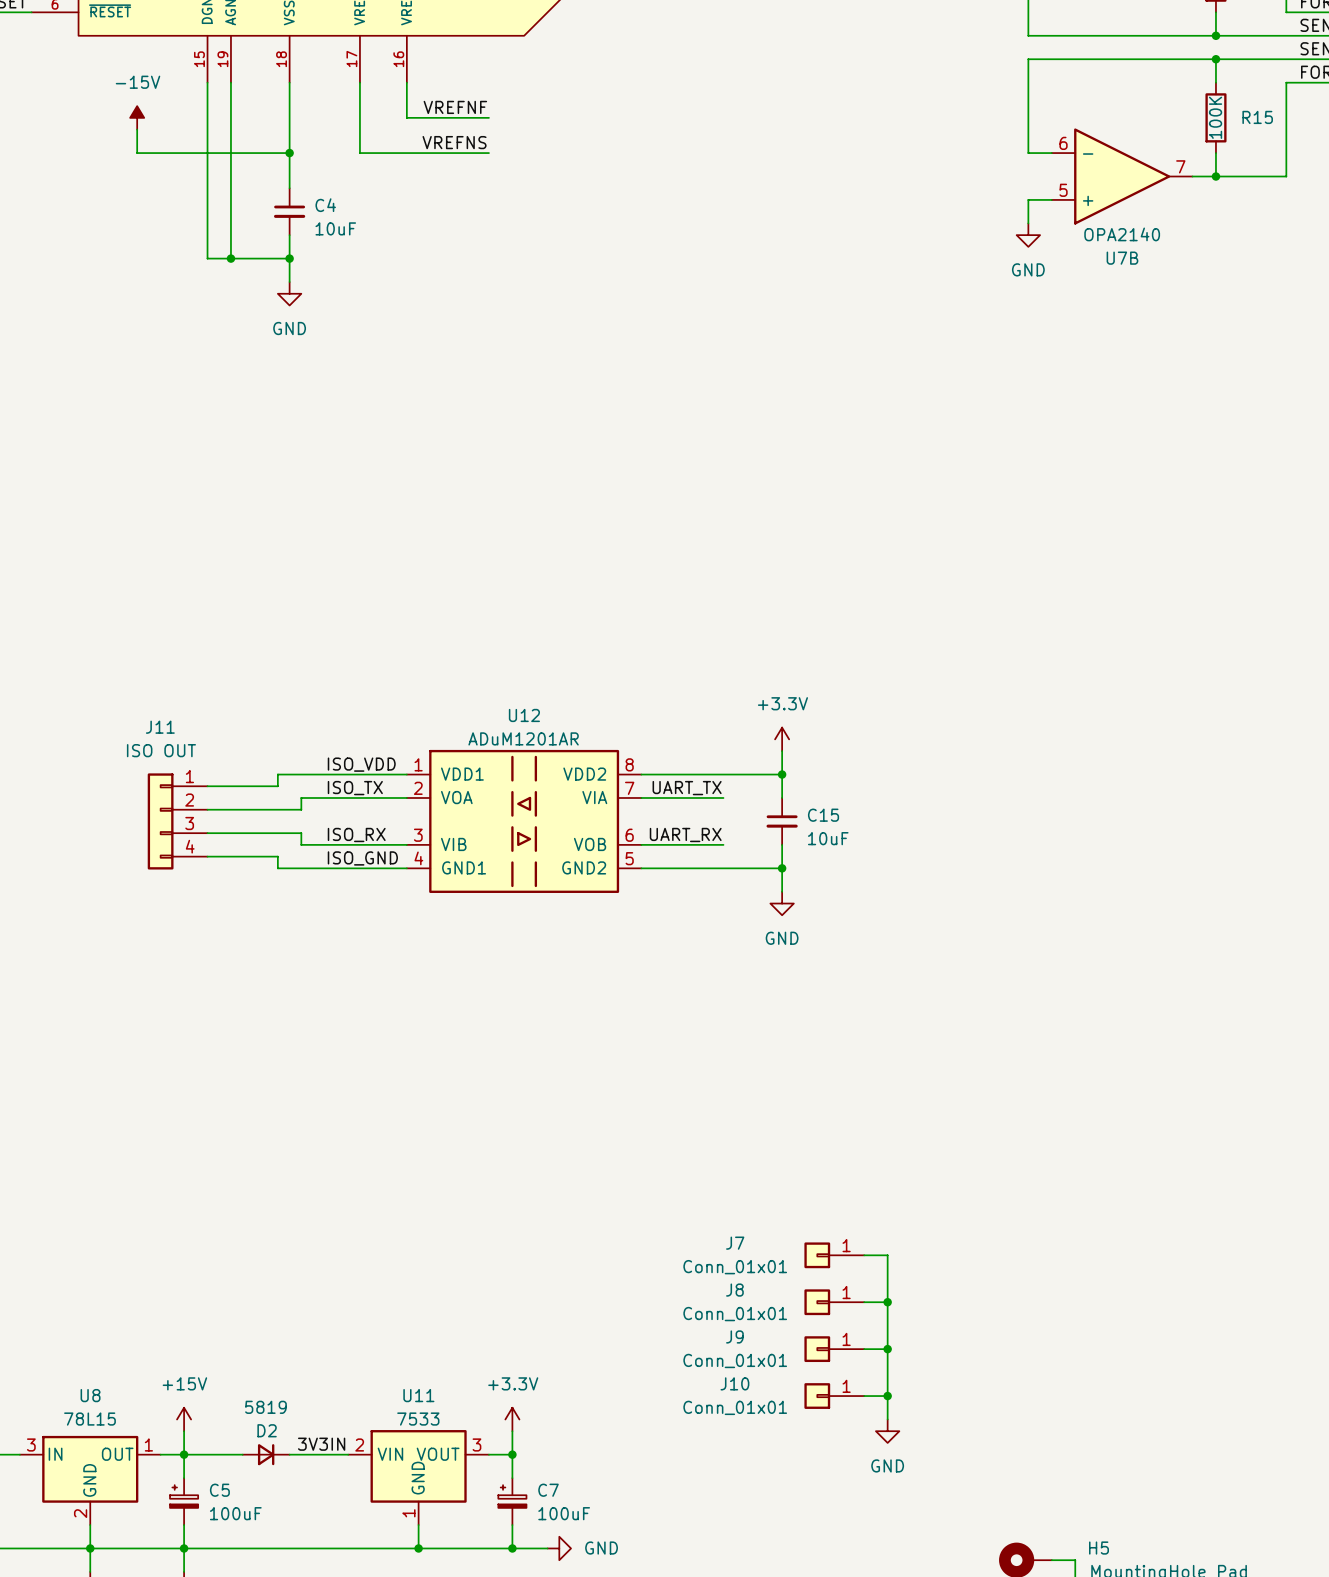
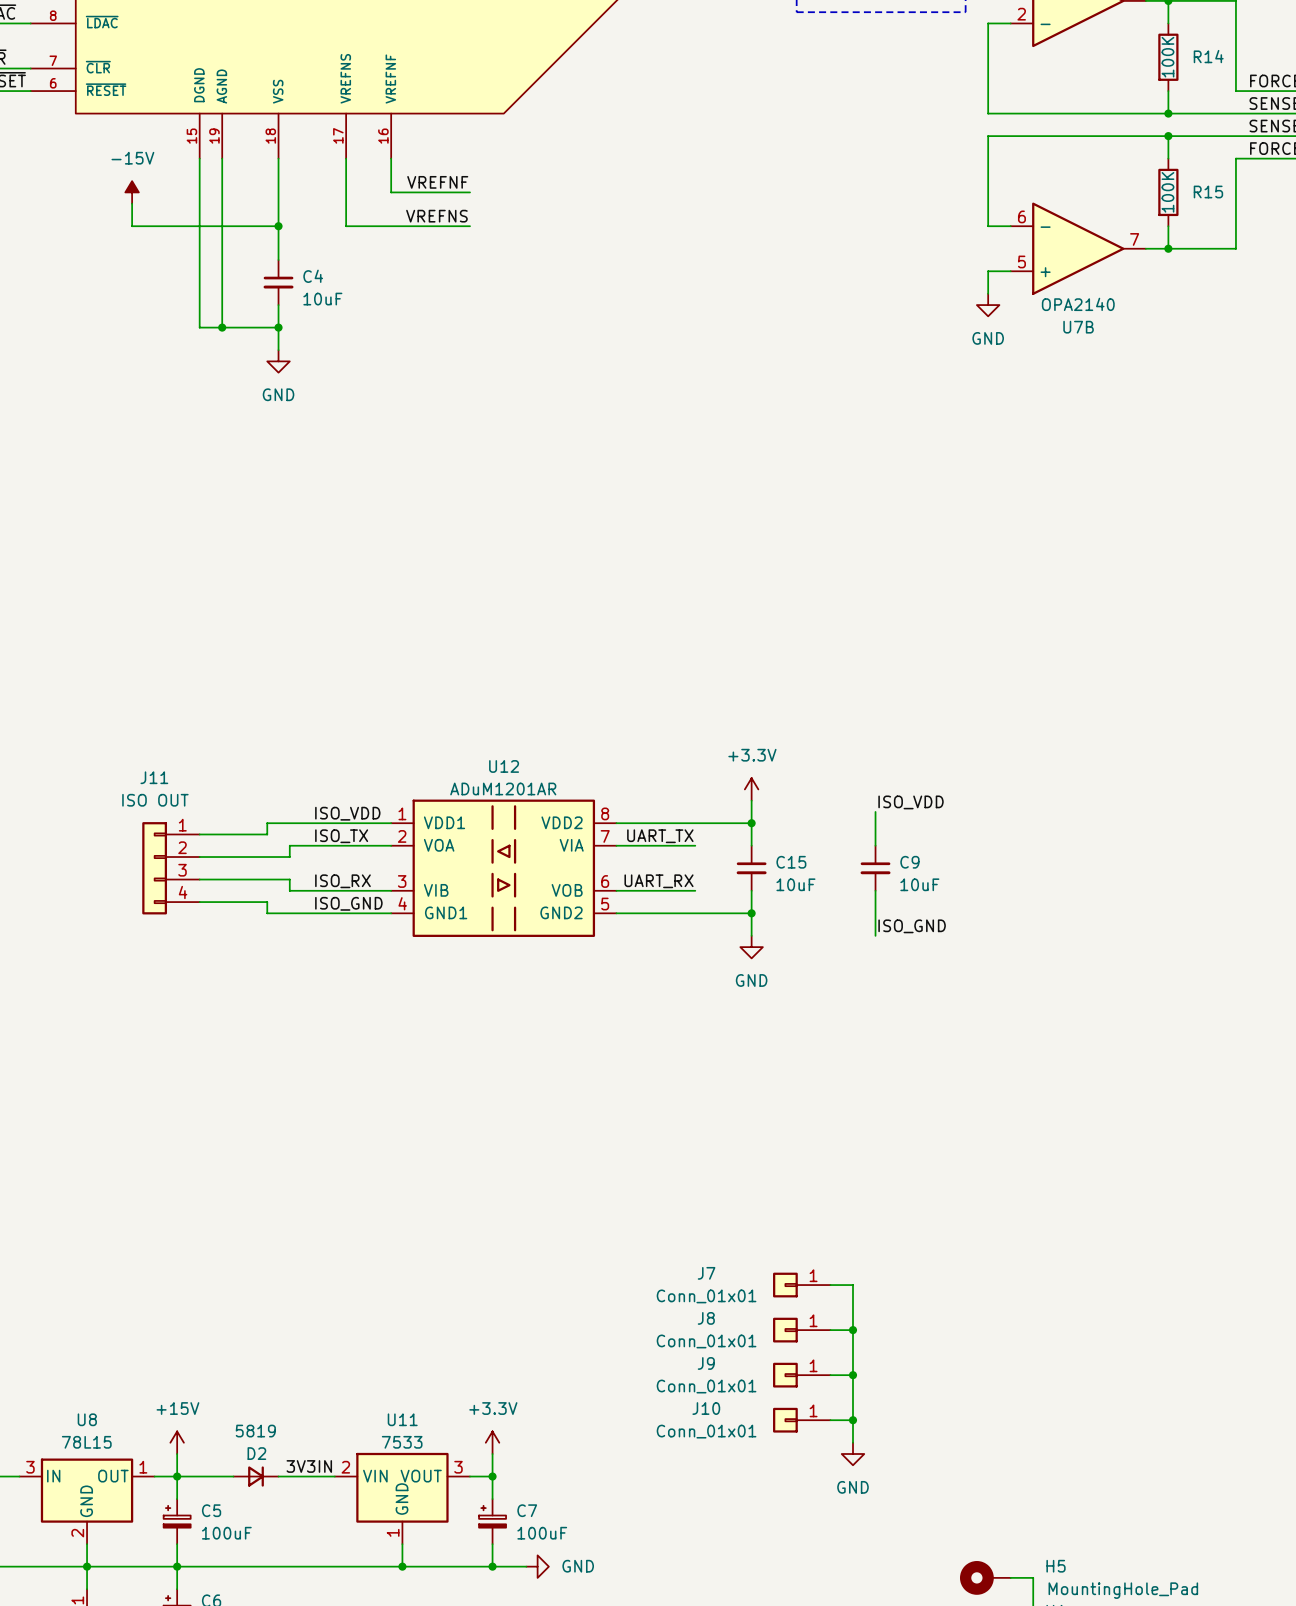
label: none -> ISO_VDD (911, 802)
wire: none -> (875, 811) (875, 845)
C9: none -> 10uF (875, 868)
wire: none -> (875, 890) (875, 935)
label: none -> ISO_GND (912, 926)

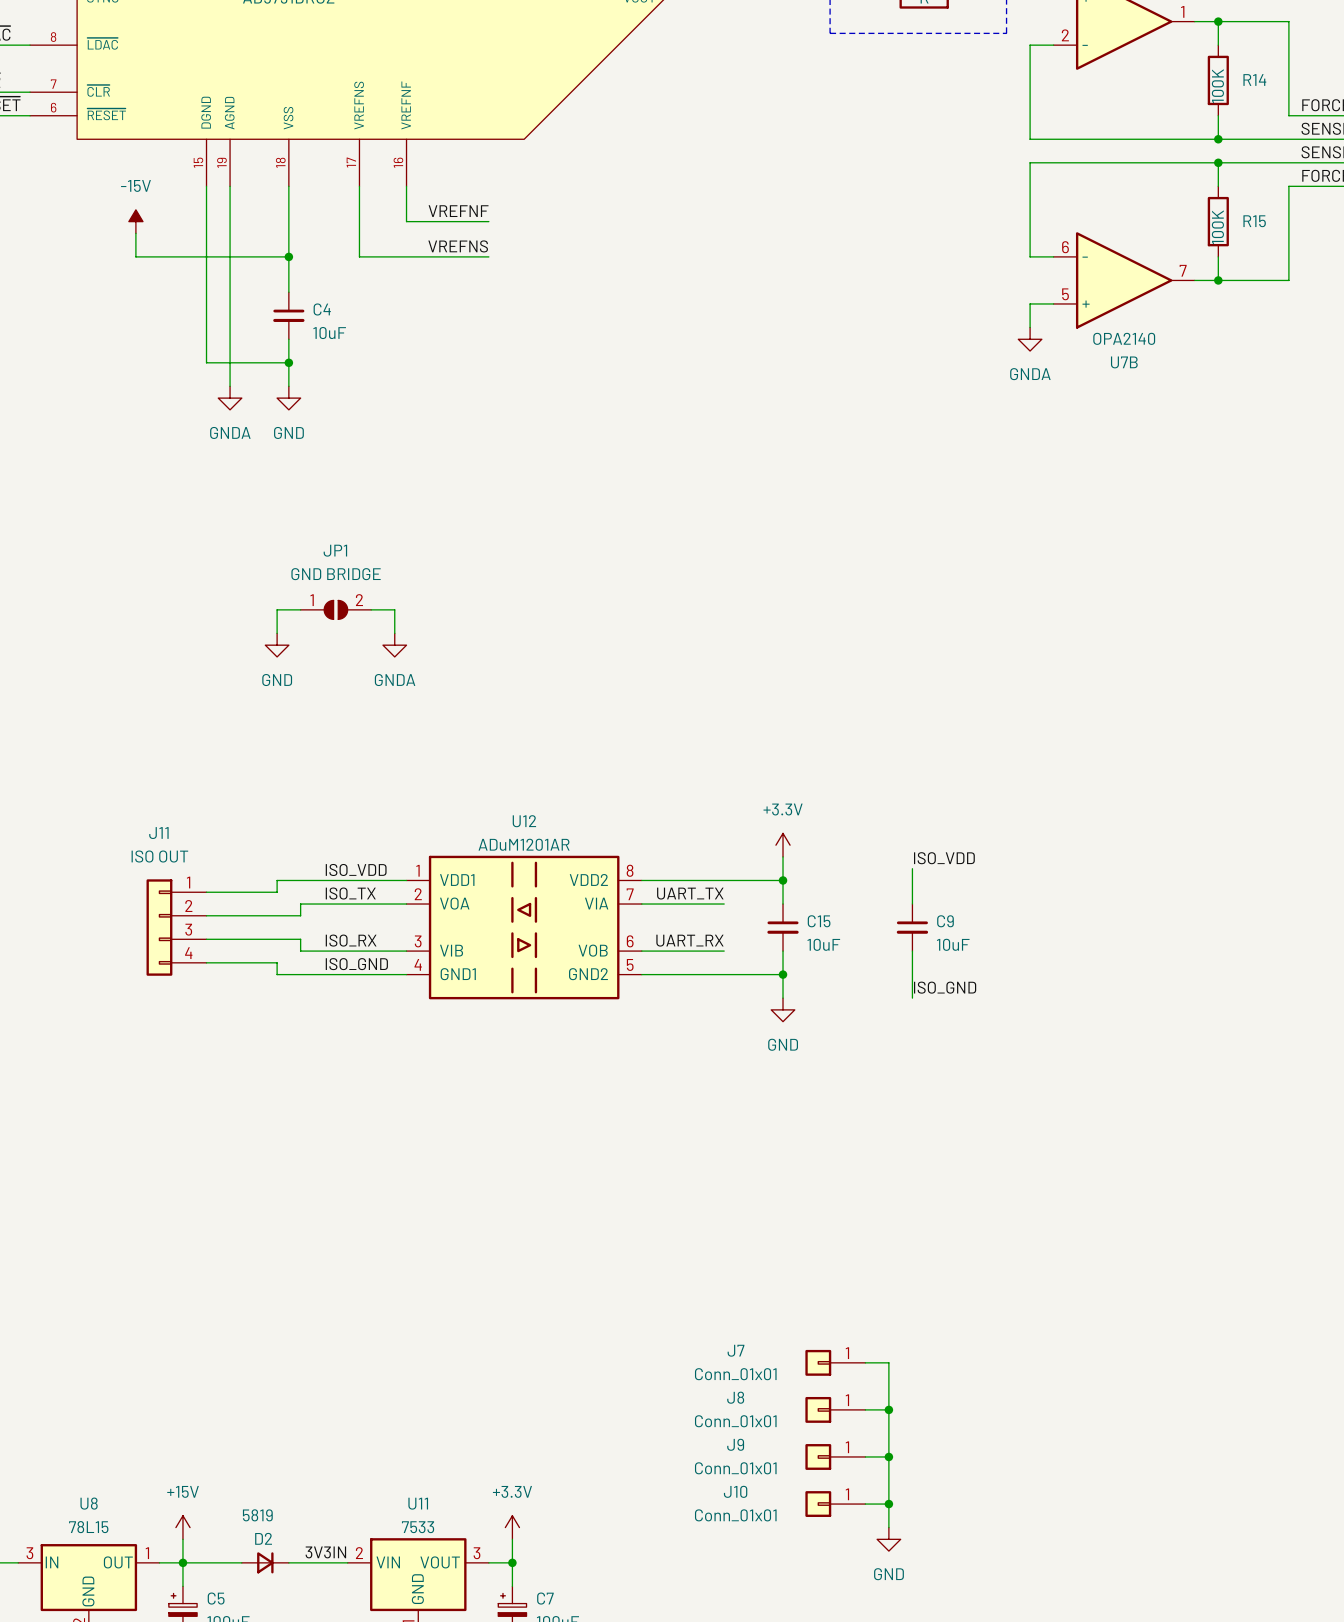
power symbol: GND (988, 305) -> GNDA (1030, 339)
wire: none -> (230, 362) (230, 386)
junction: (222, 327) -> none
power symbol: none -> GNDA (230, 398)
wire: none -> (300, 609) (277, 609) (277, 633)
JP1: none -> GND BRIDGE (335, 609)
wire: none -> (371, 609) (394, 609) (394, 633)
power symbol: none -> GND (277, 645)
power symbol: none -> GNDA (394, 645)

